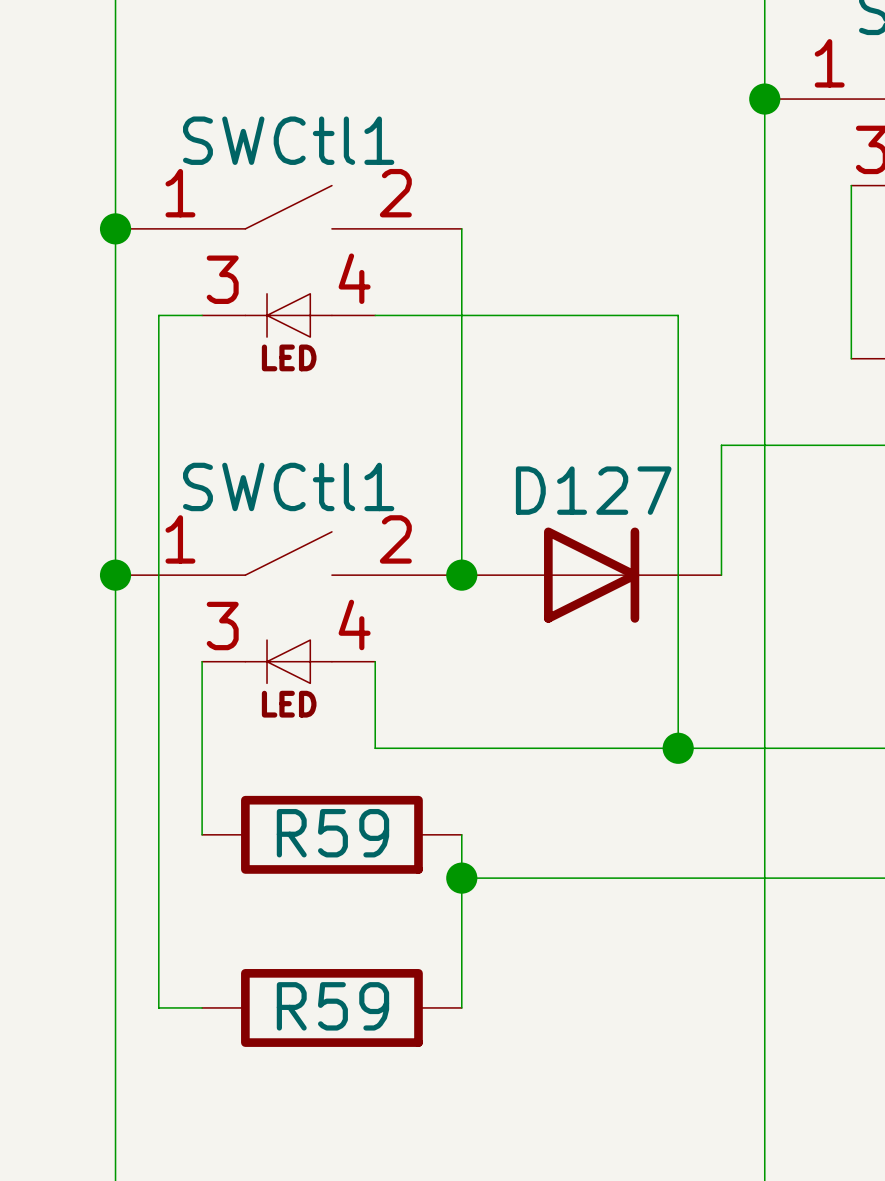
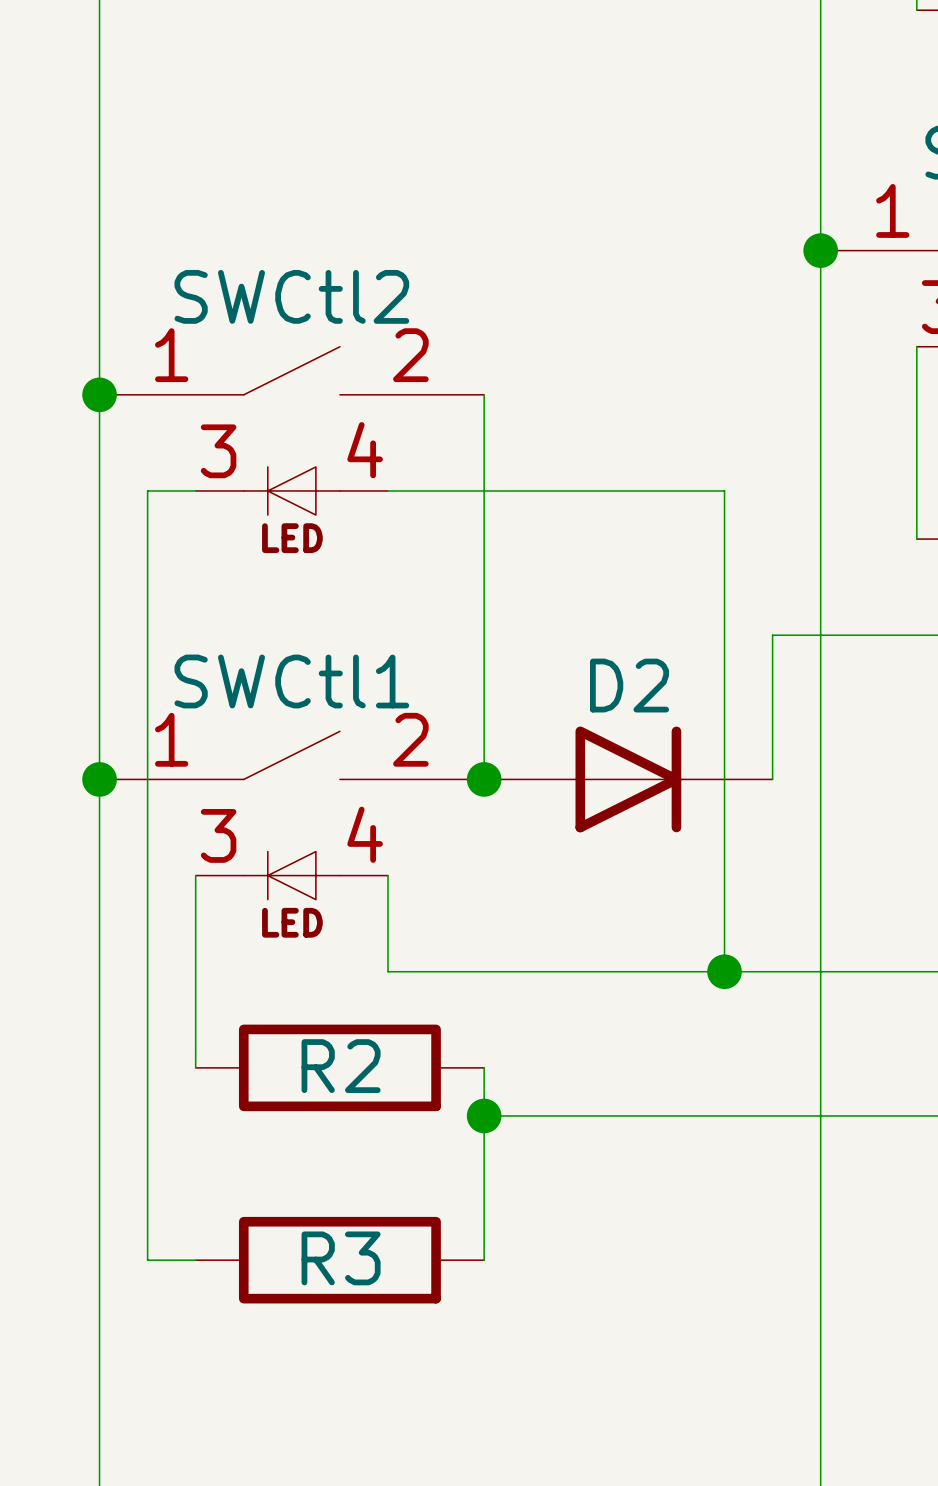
SWCtl1 name: SWCtl1 (288, 140) -> SWCtl2 (291, 296)
D127 name: D127 (593, 490) -> D2 (629, 685)
R59 name: R59 (332, 833) -> R2 (341, 1066)
R59 name: R59 (332, 1006) -> R3 (341, 1258)

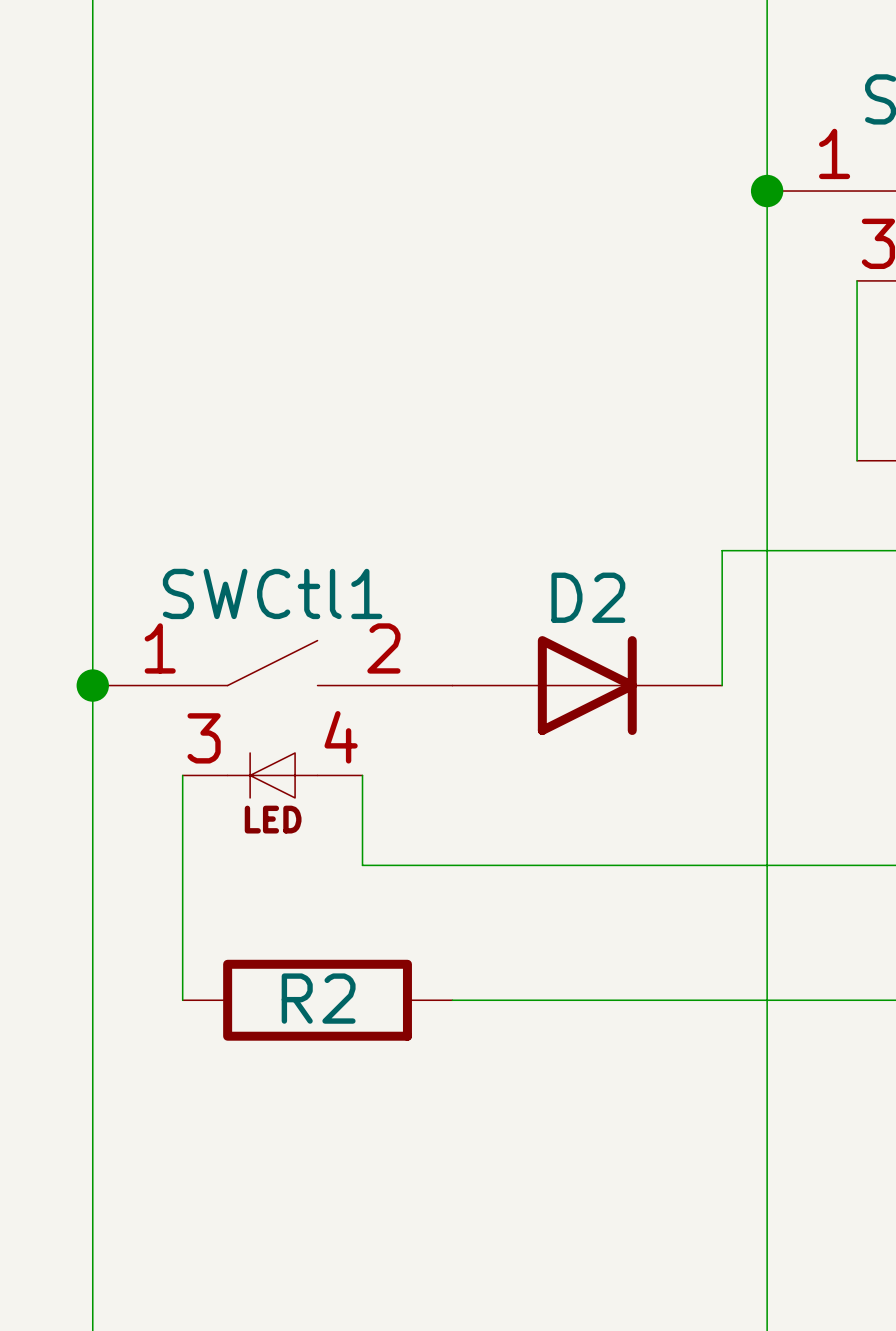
junction: (99, 394) -> none
wire: (484, 394) (484, 779) -> none
SWCtl2: (291, 430) -> none
wire: (195, 490) (147, 490) (147, 1260) (195, 1260) -> none
wire: (388, 490) (724, 490) (724, 971) -> none
junction: (484, 779) -> none
junction: (724, 971) -> none
wire: none -> (182, 955) (182, 1000)
R2 position: (339, 1067) -> (317, 1000)
wire: (484, 1067) (484, 1260) -> none
junction: (484, 1115) -> none
R3: (339, 1260) -> none

